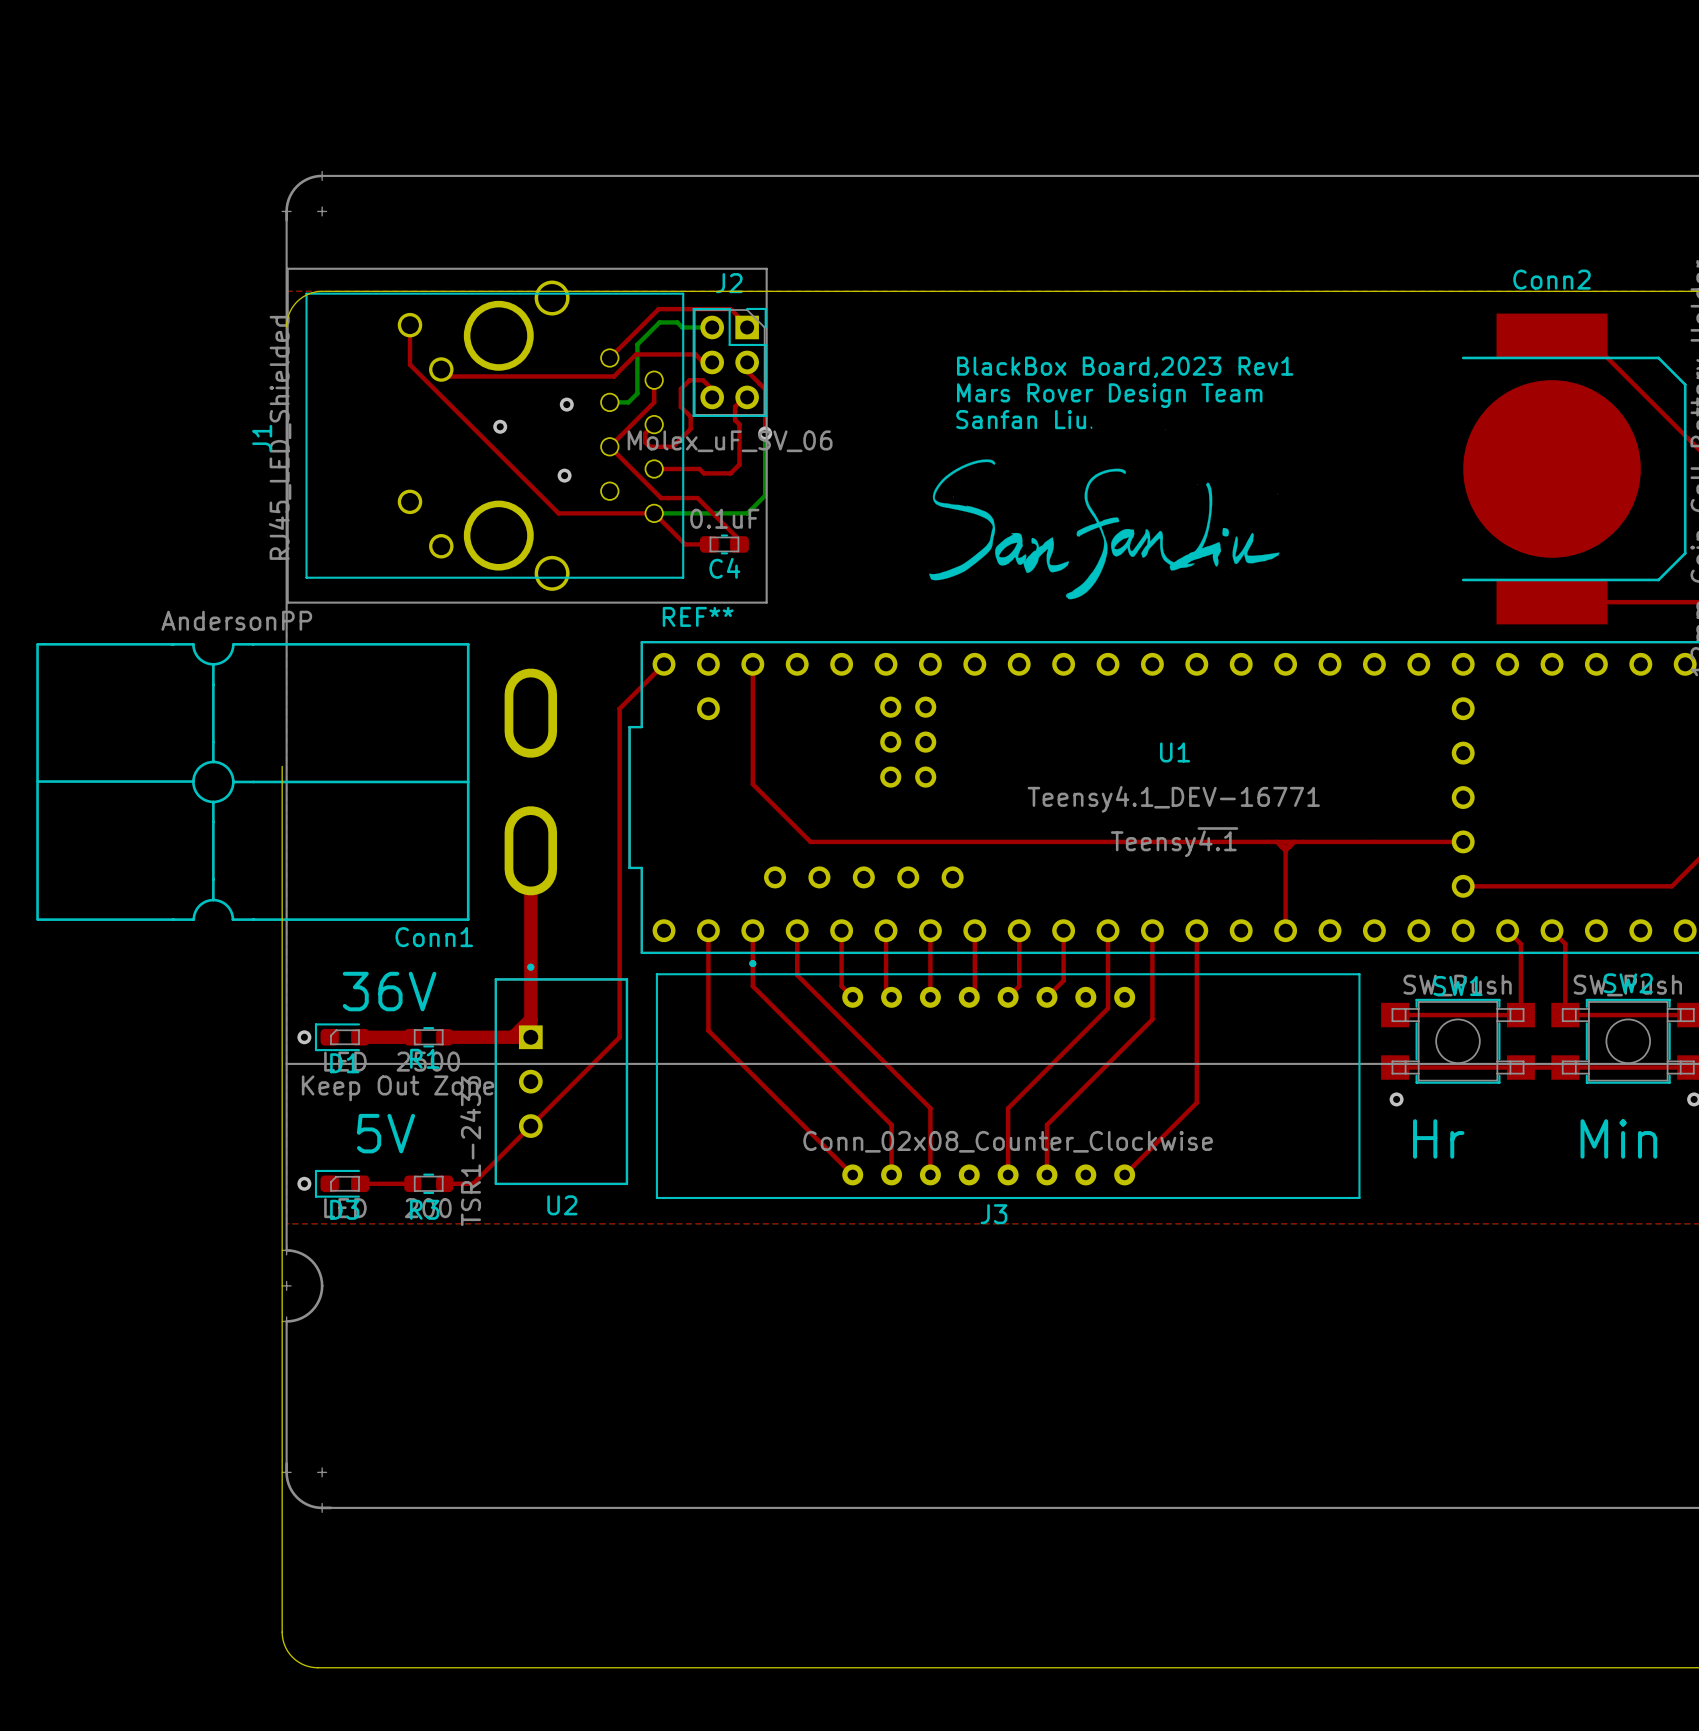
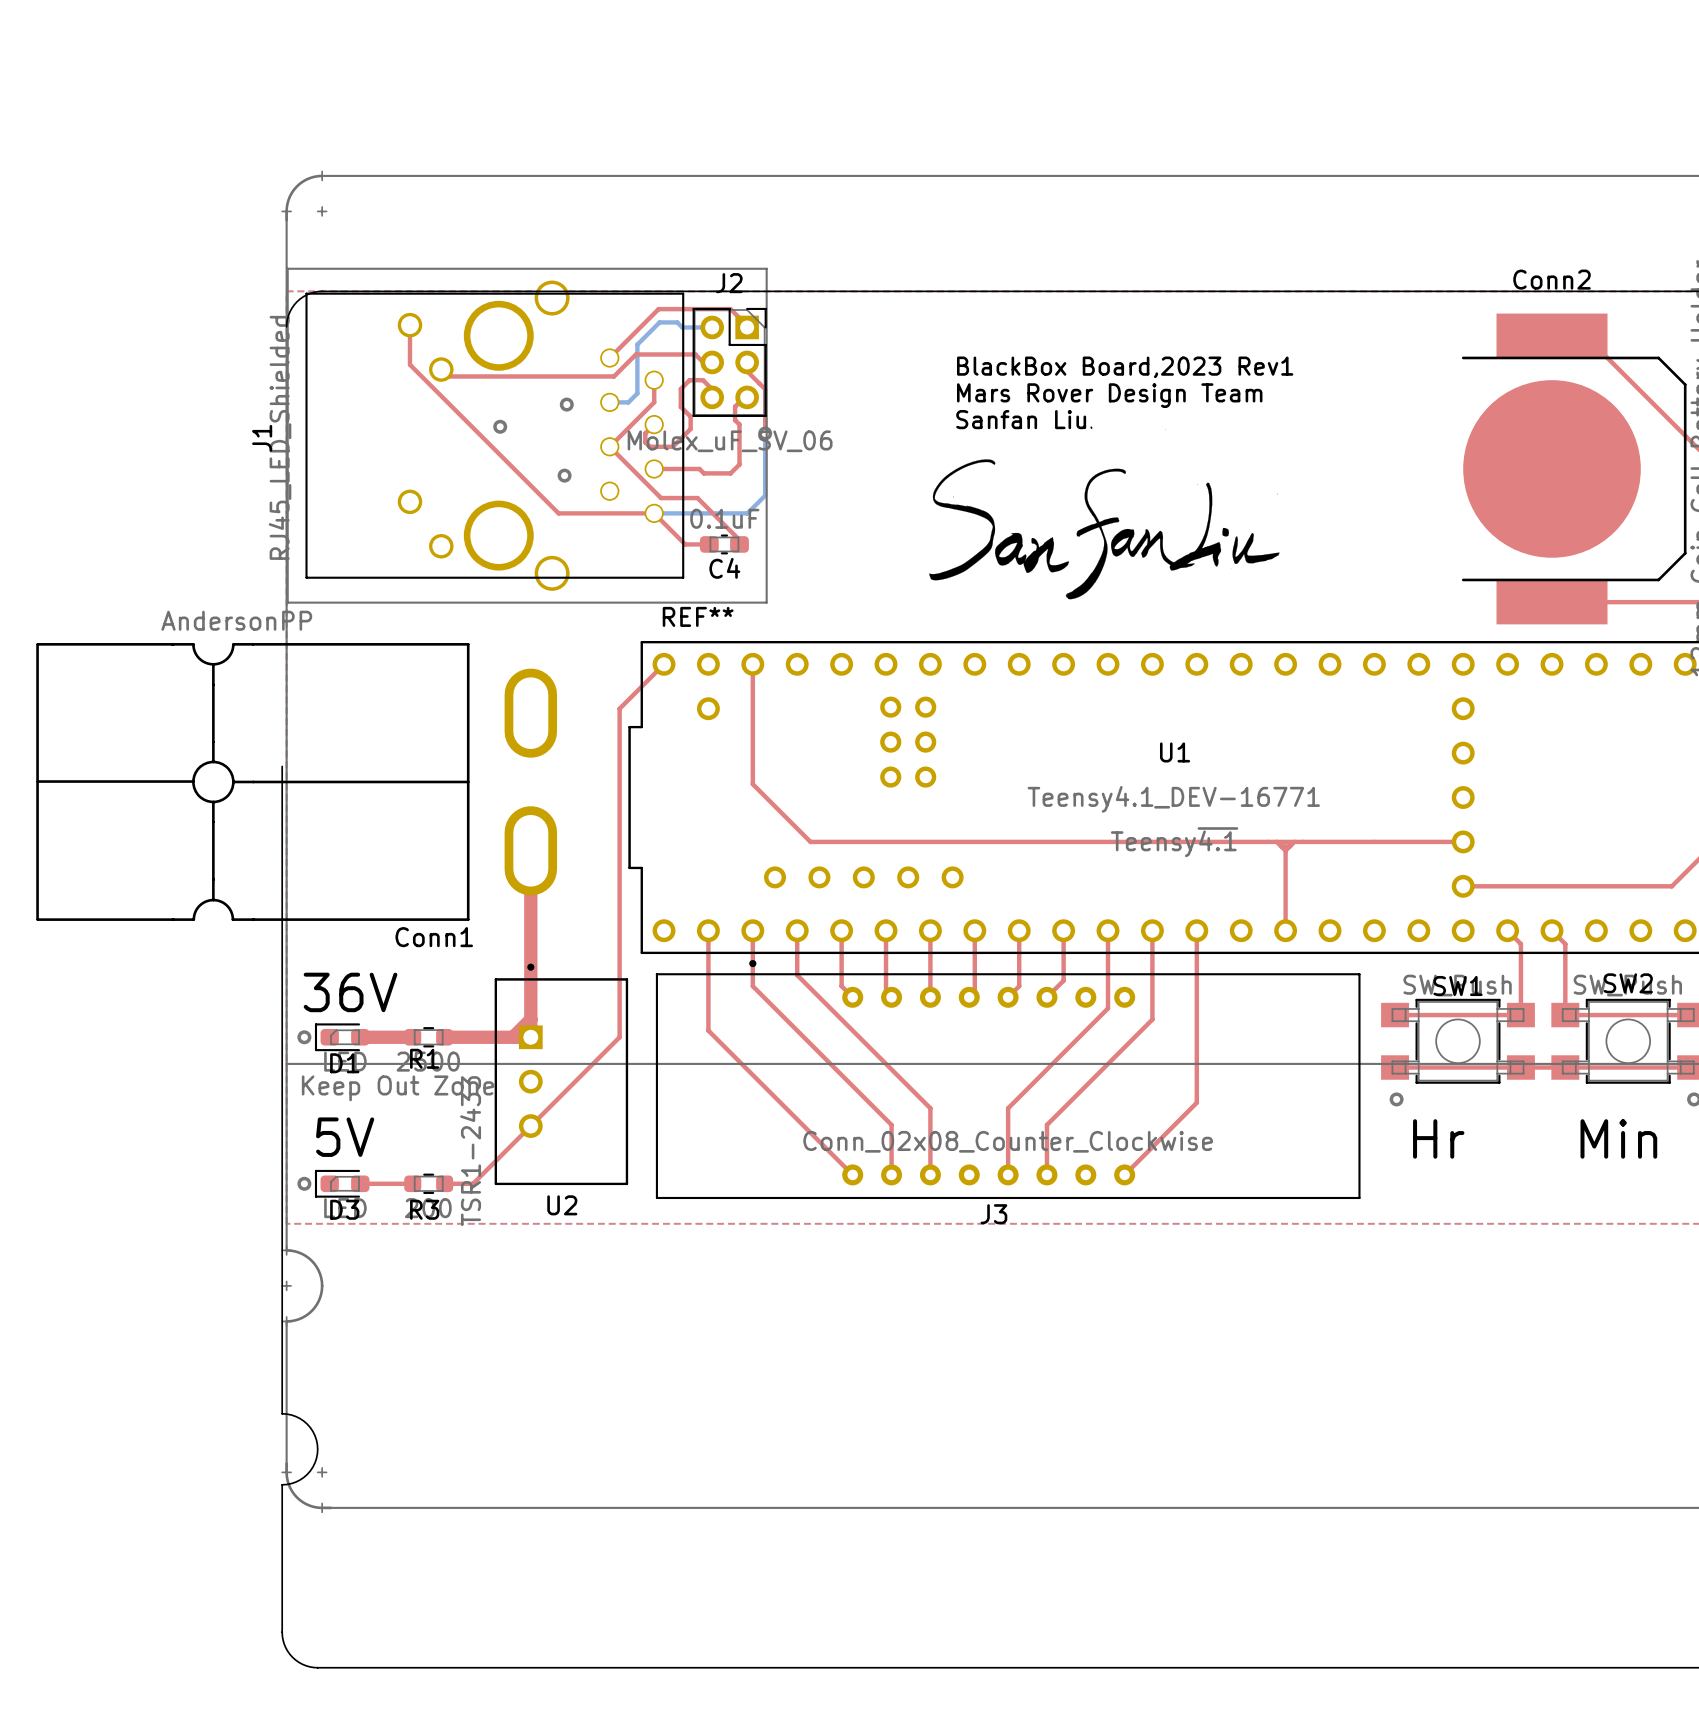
text position: 36V (389, 991) -> 36V (350, 992)
text position: 5V (385, 1133) -> 5V (345, 1137)
board edge: (282, 1413) (282, 1484) -> (282, 1413) (295, 1416) (307, 1424) (315, 1435) (317, 1449) (315, 1462) (307, 1474) (295, 1482) (282, 1484)

